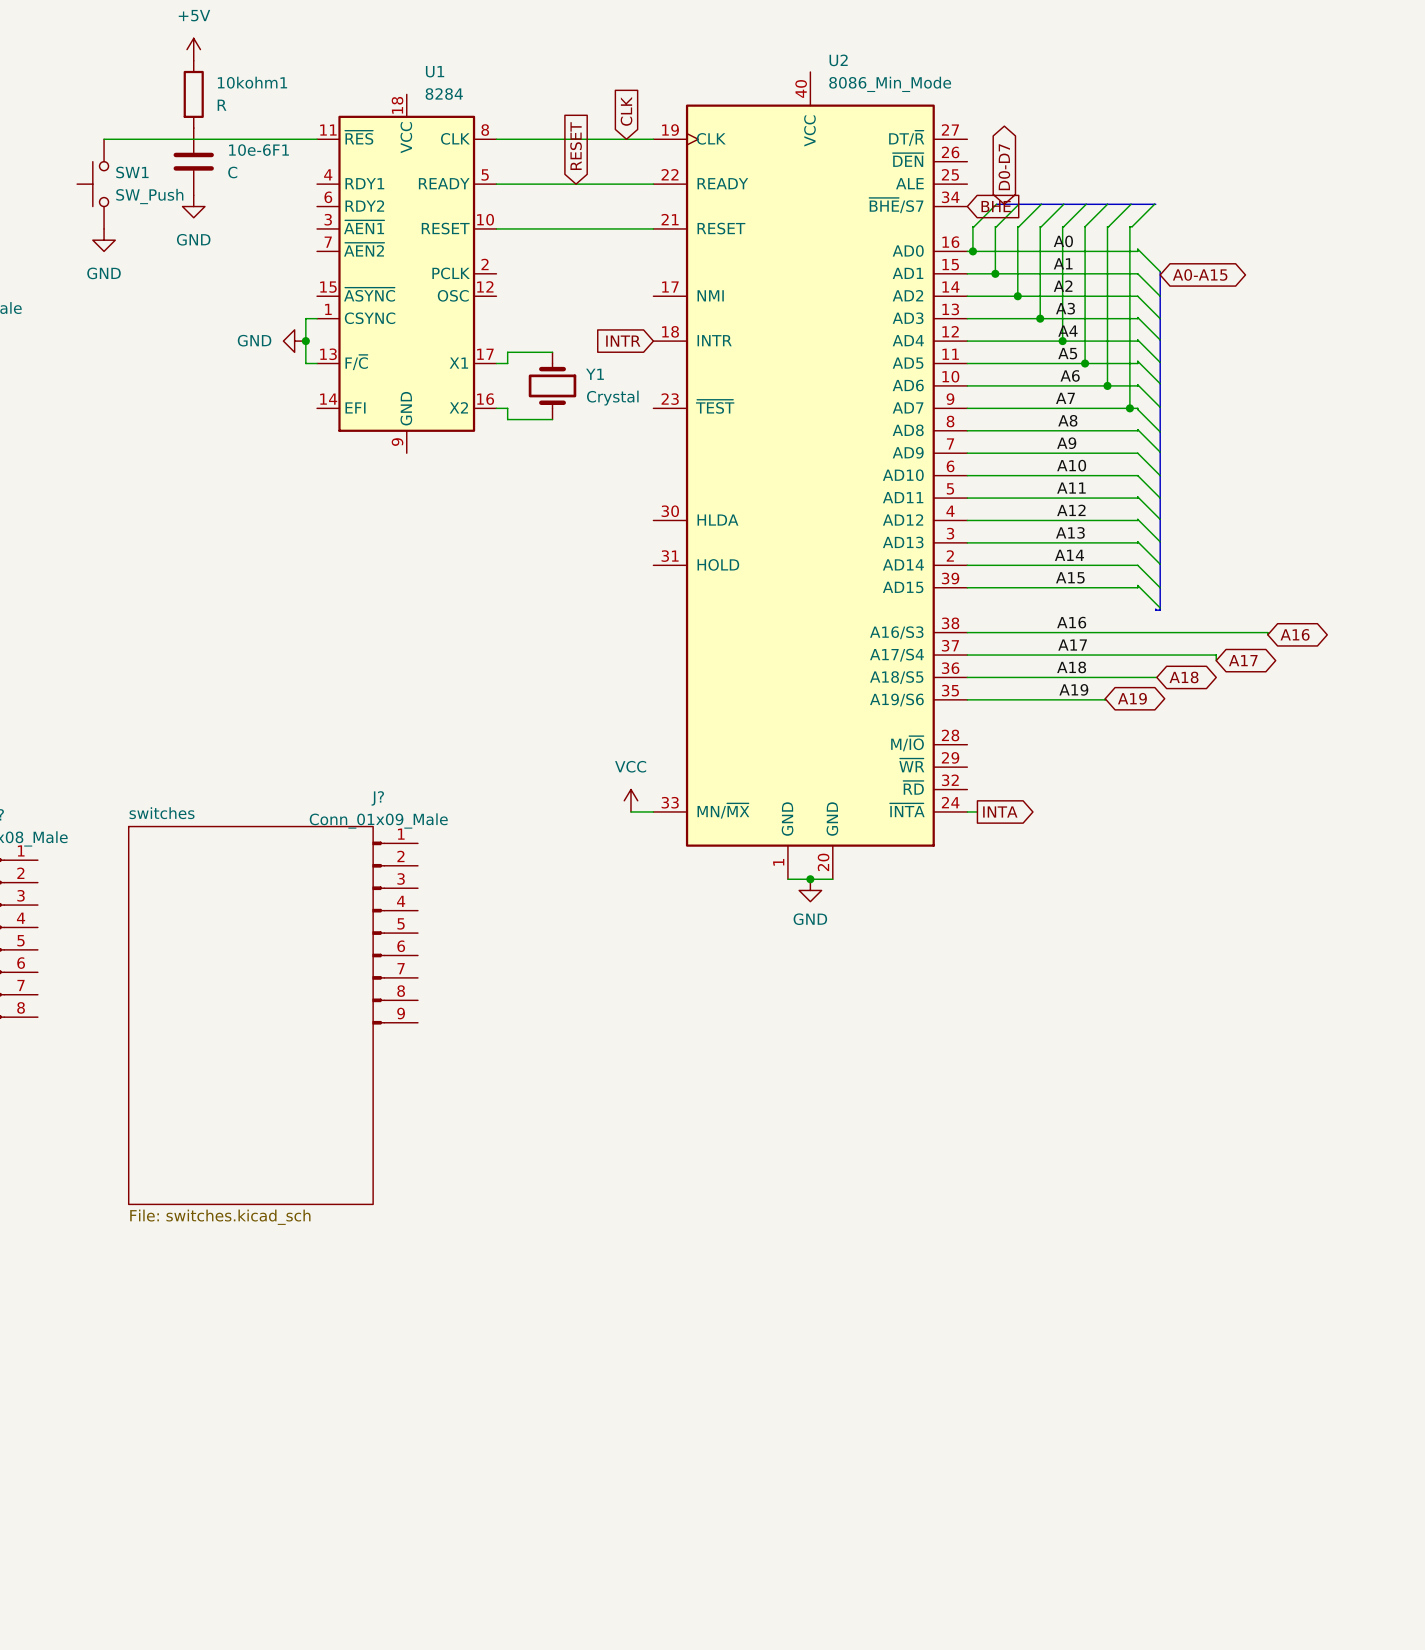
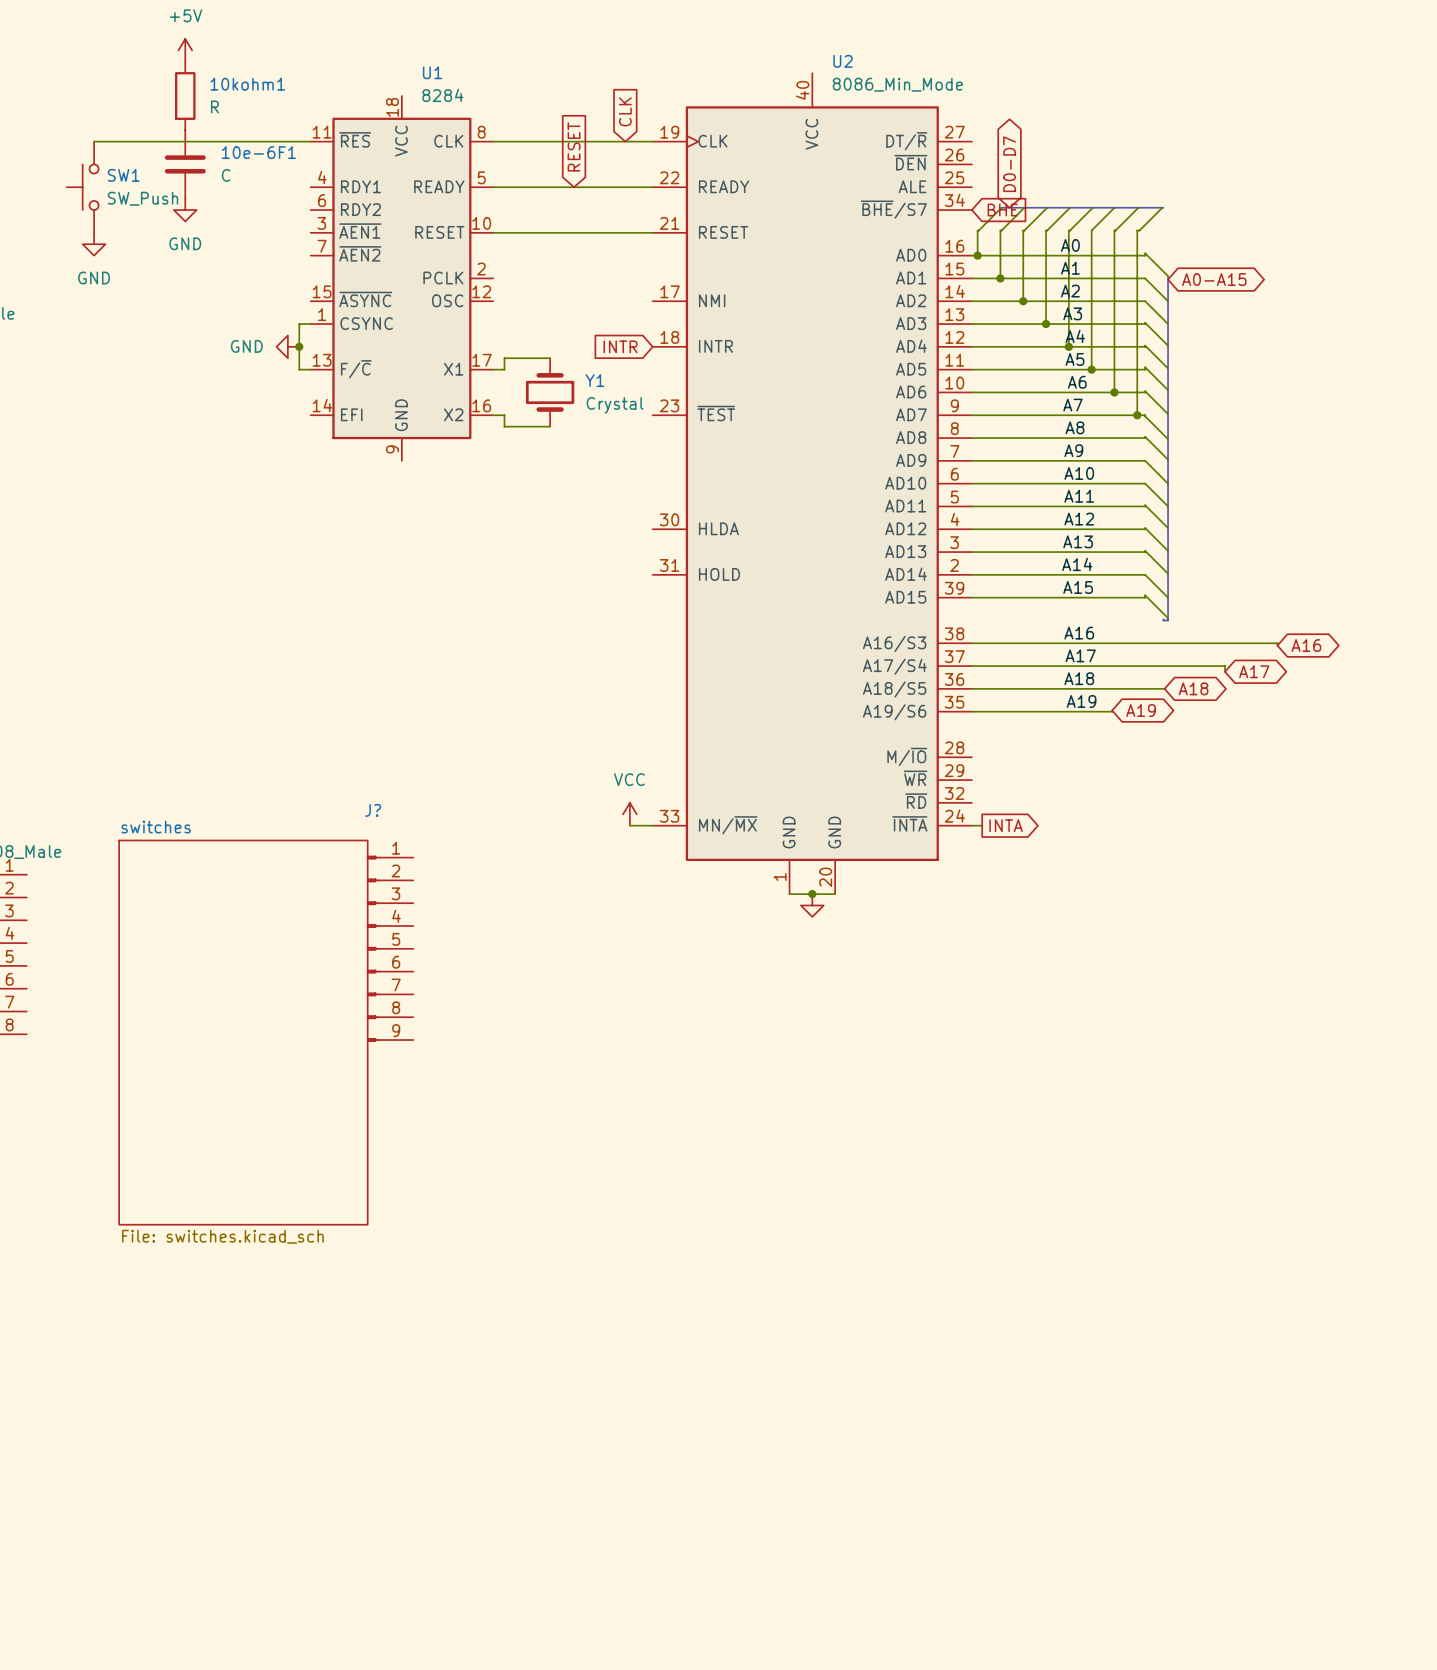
J? value: Conn_01x09_Male (378, 820) -> none
power symbol text: GND (810, 919) -> none

